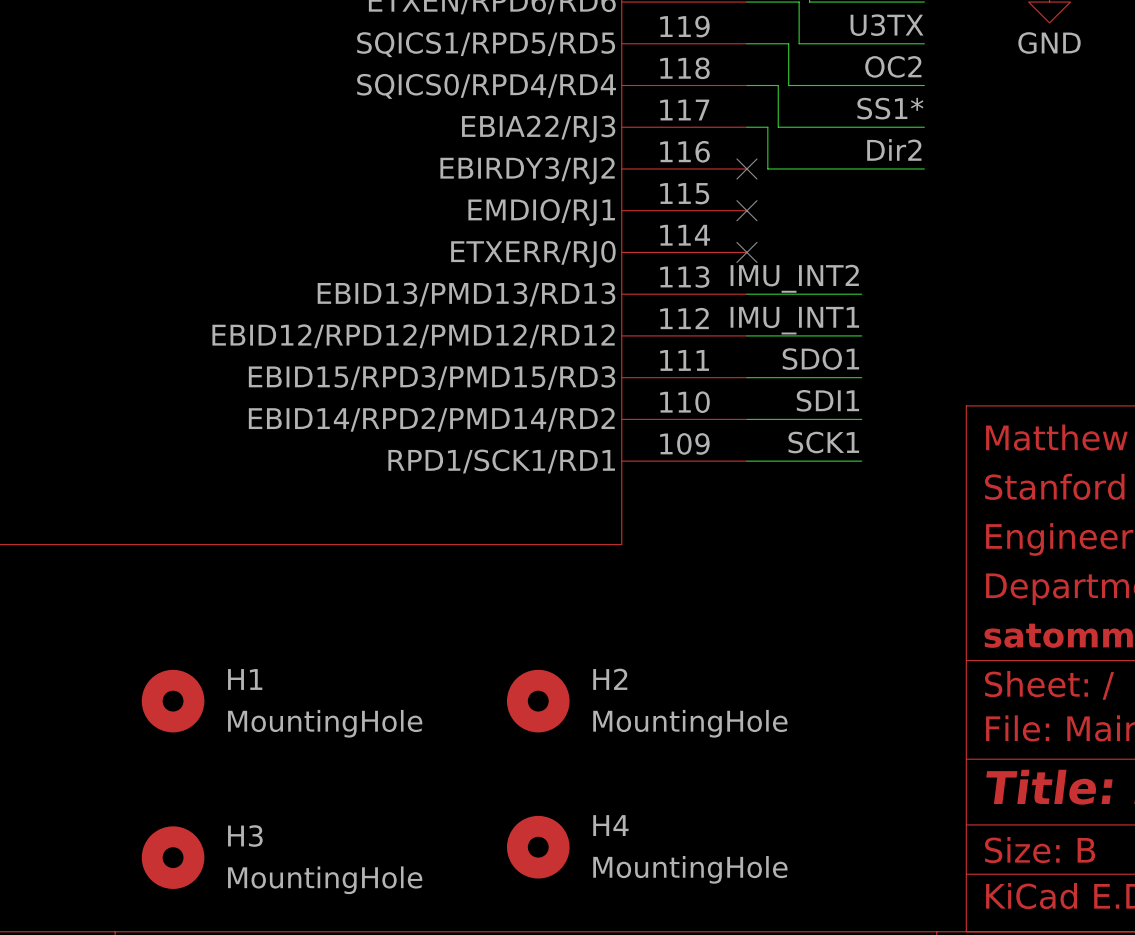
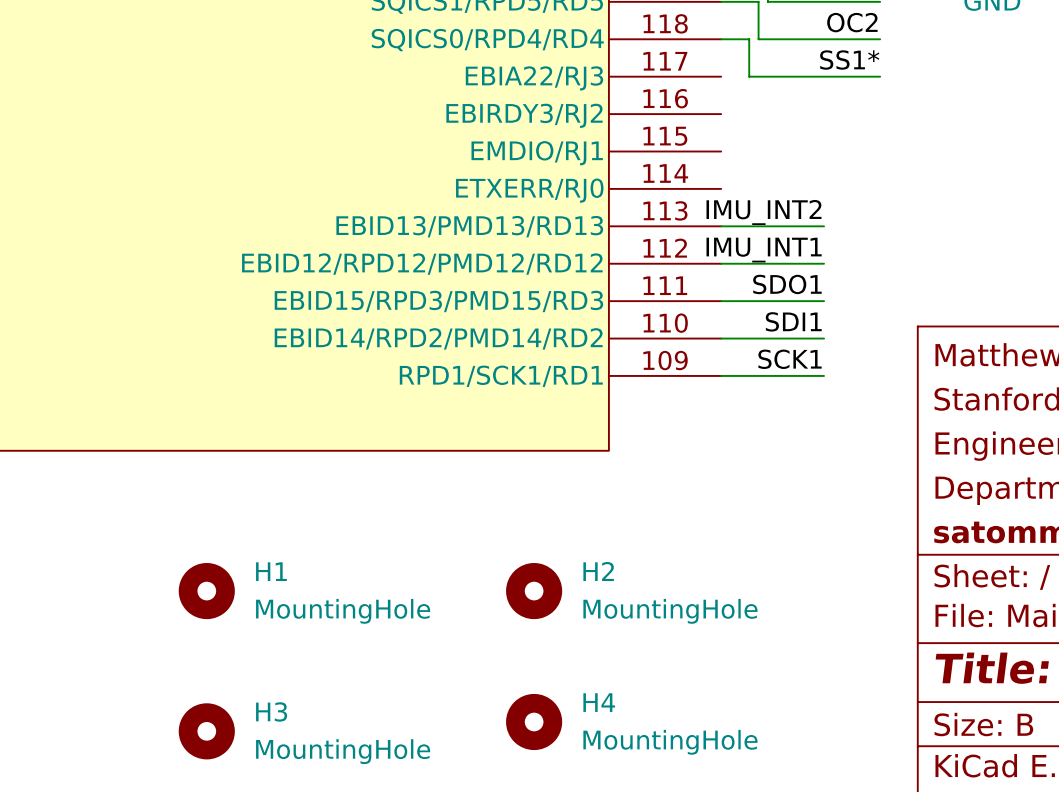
wire: (746, 127) (767, 127) (767, 168) (924, 168) -> none
label: Dir2 (894, 149) -> none
no-connect mark: (746, 168) -> none
no-connect mark: (746, 210) -> none
no-connect mark: (746, 252) -> none

